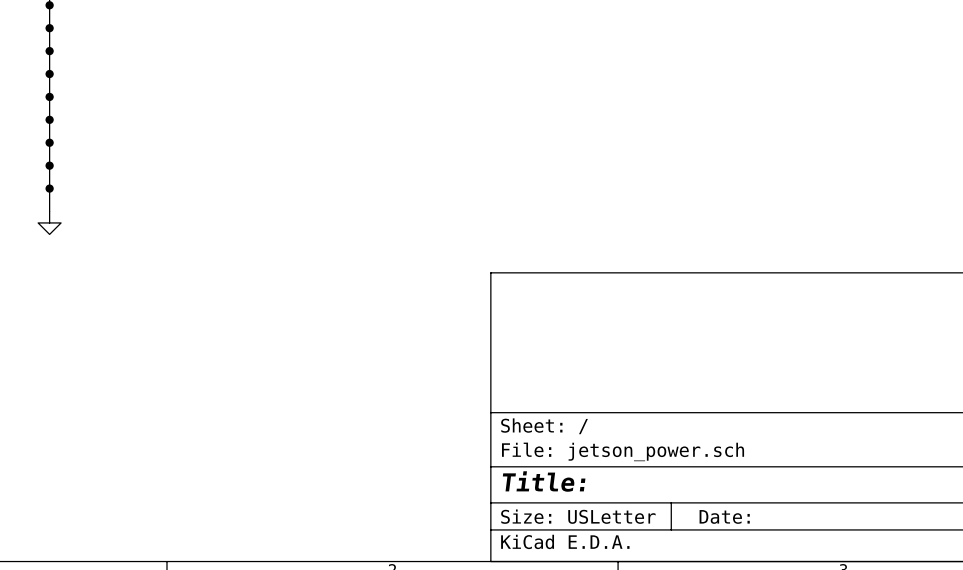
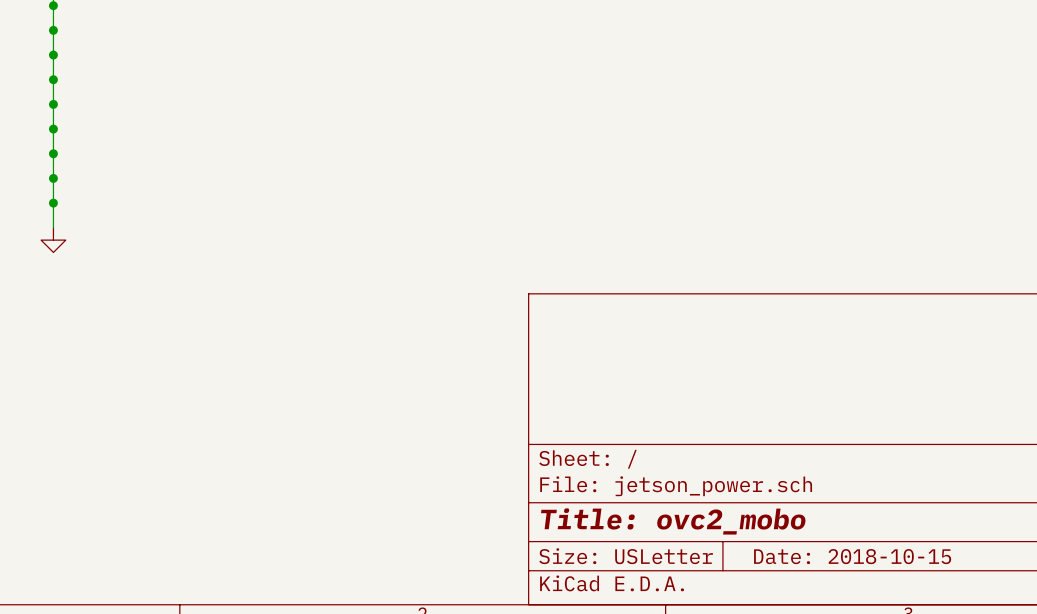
title block: Title: (544, 481) -> Title: ovc2_mobo (673, 521)
title block: Date: (724, 516) -> Date: 2018-10-15 (852, 556)

